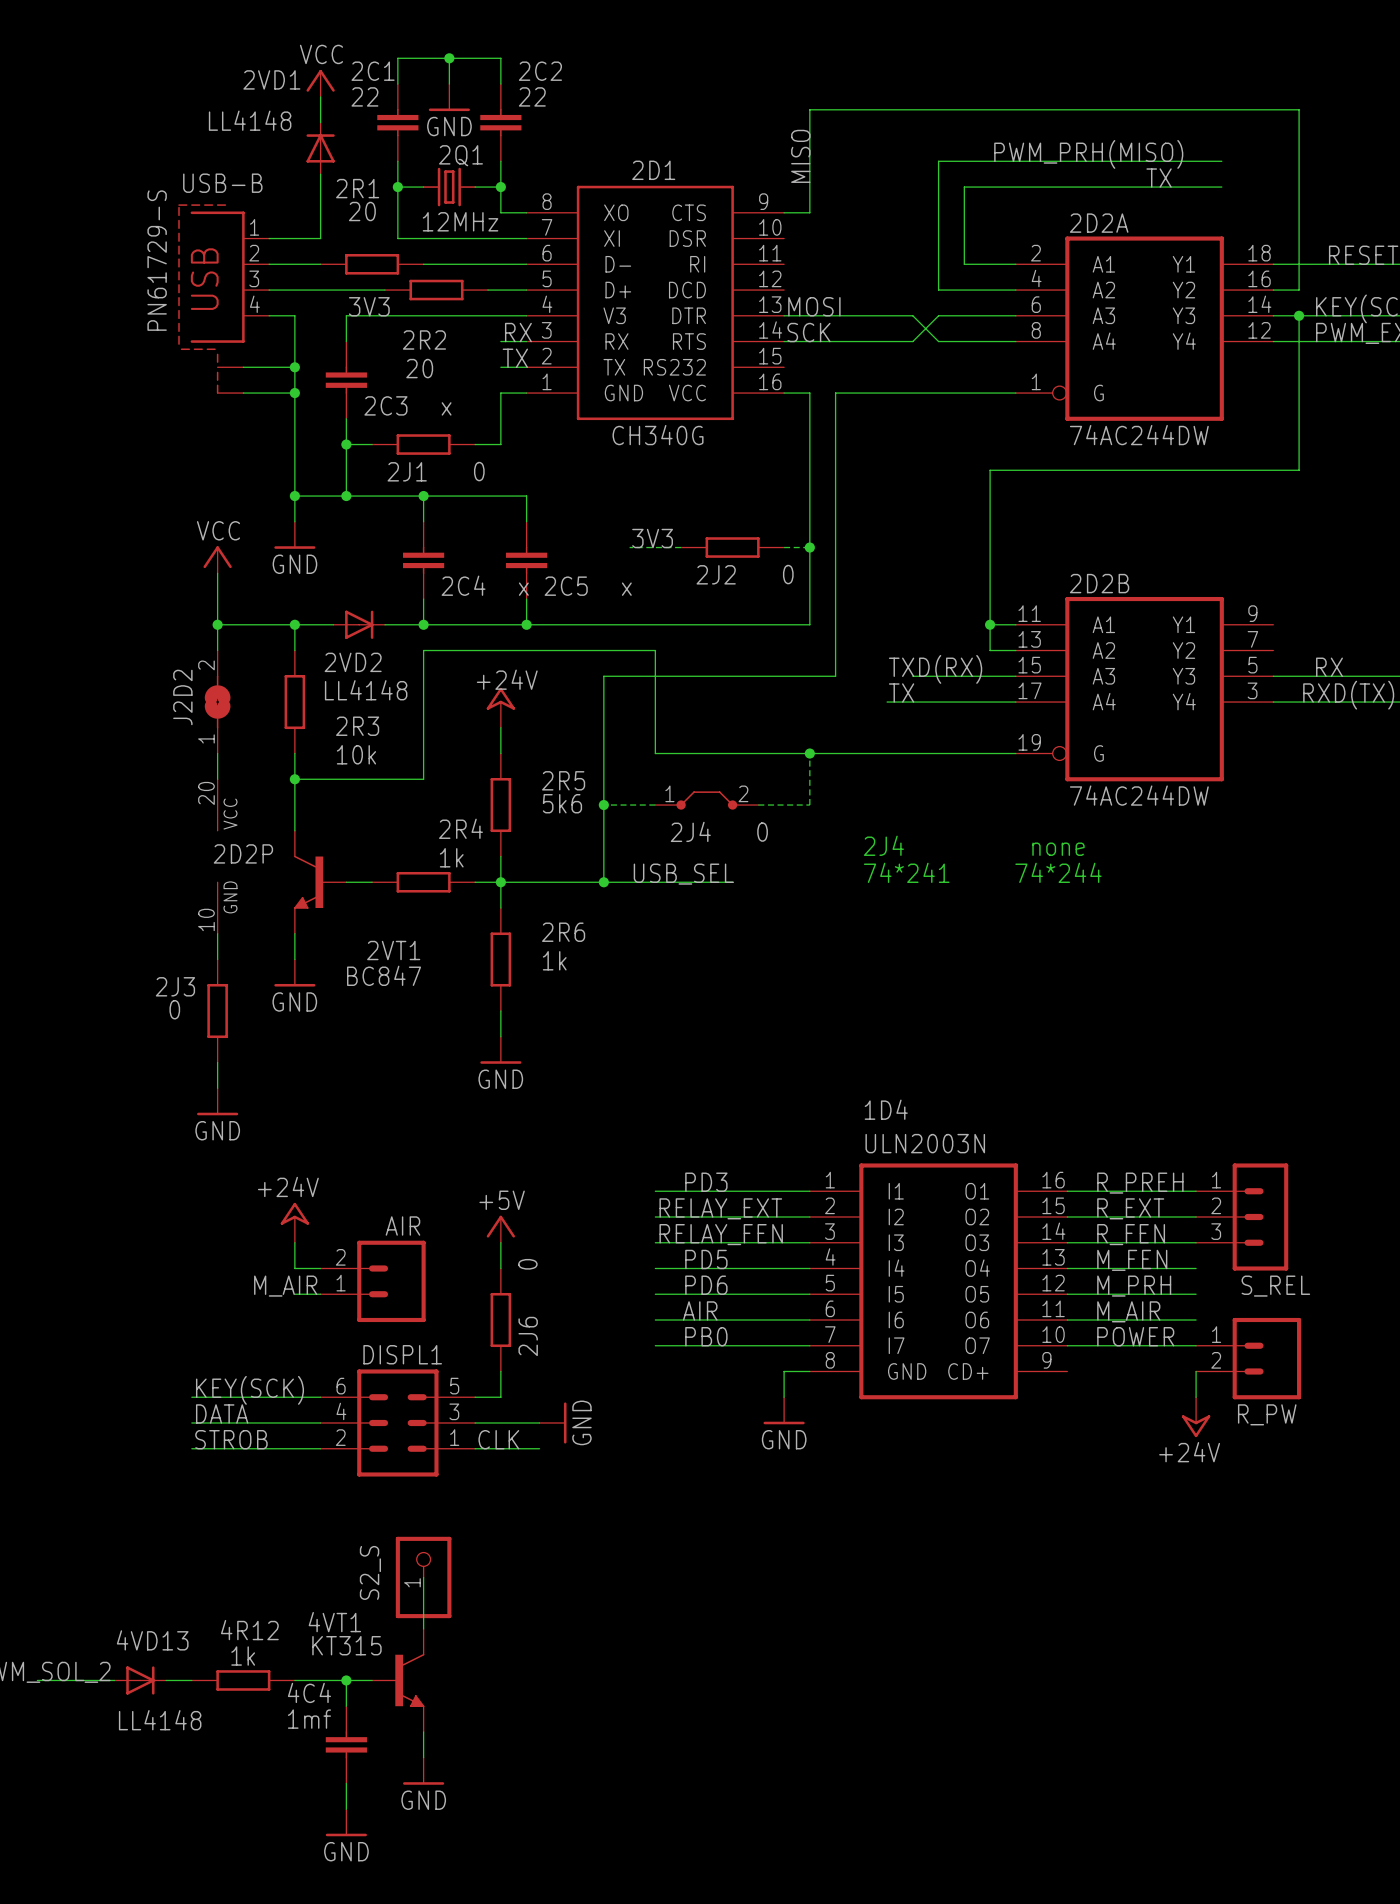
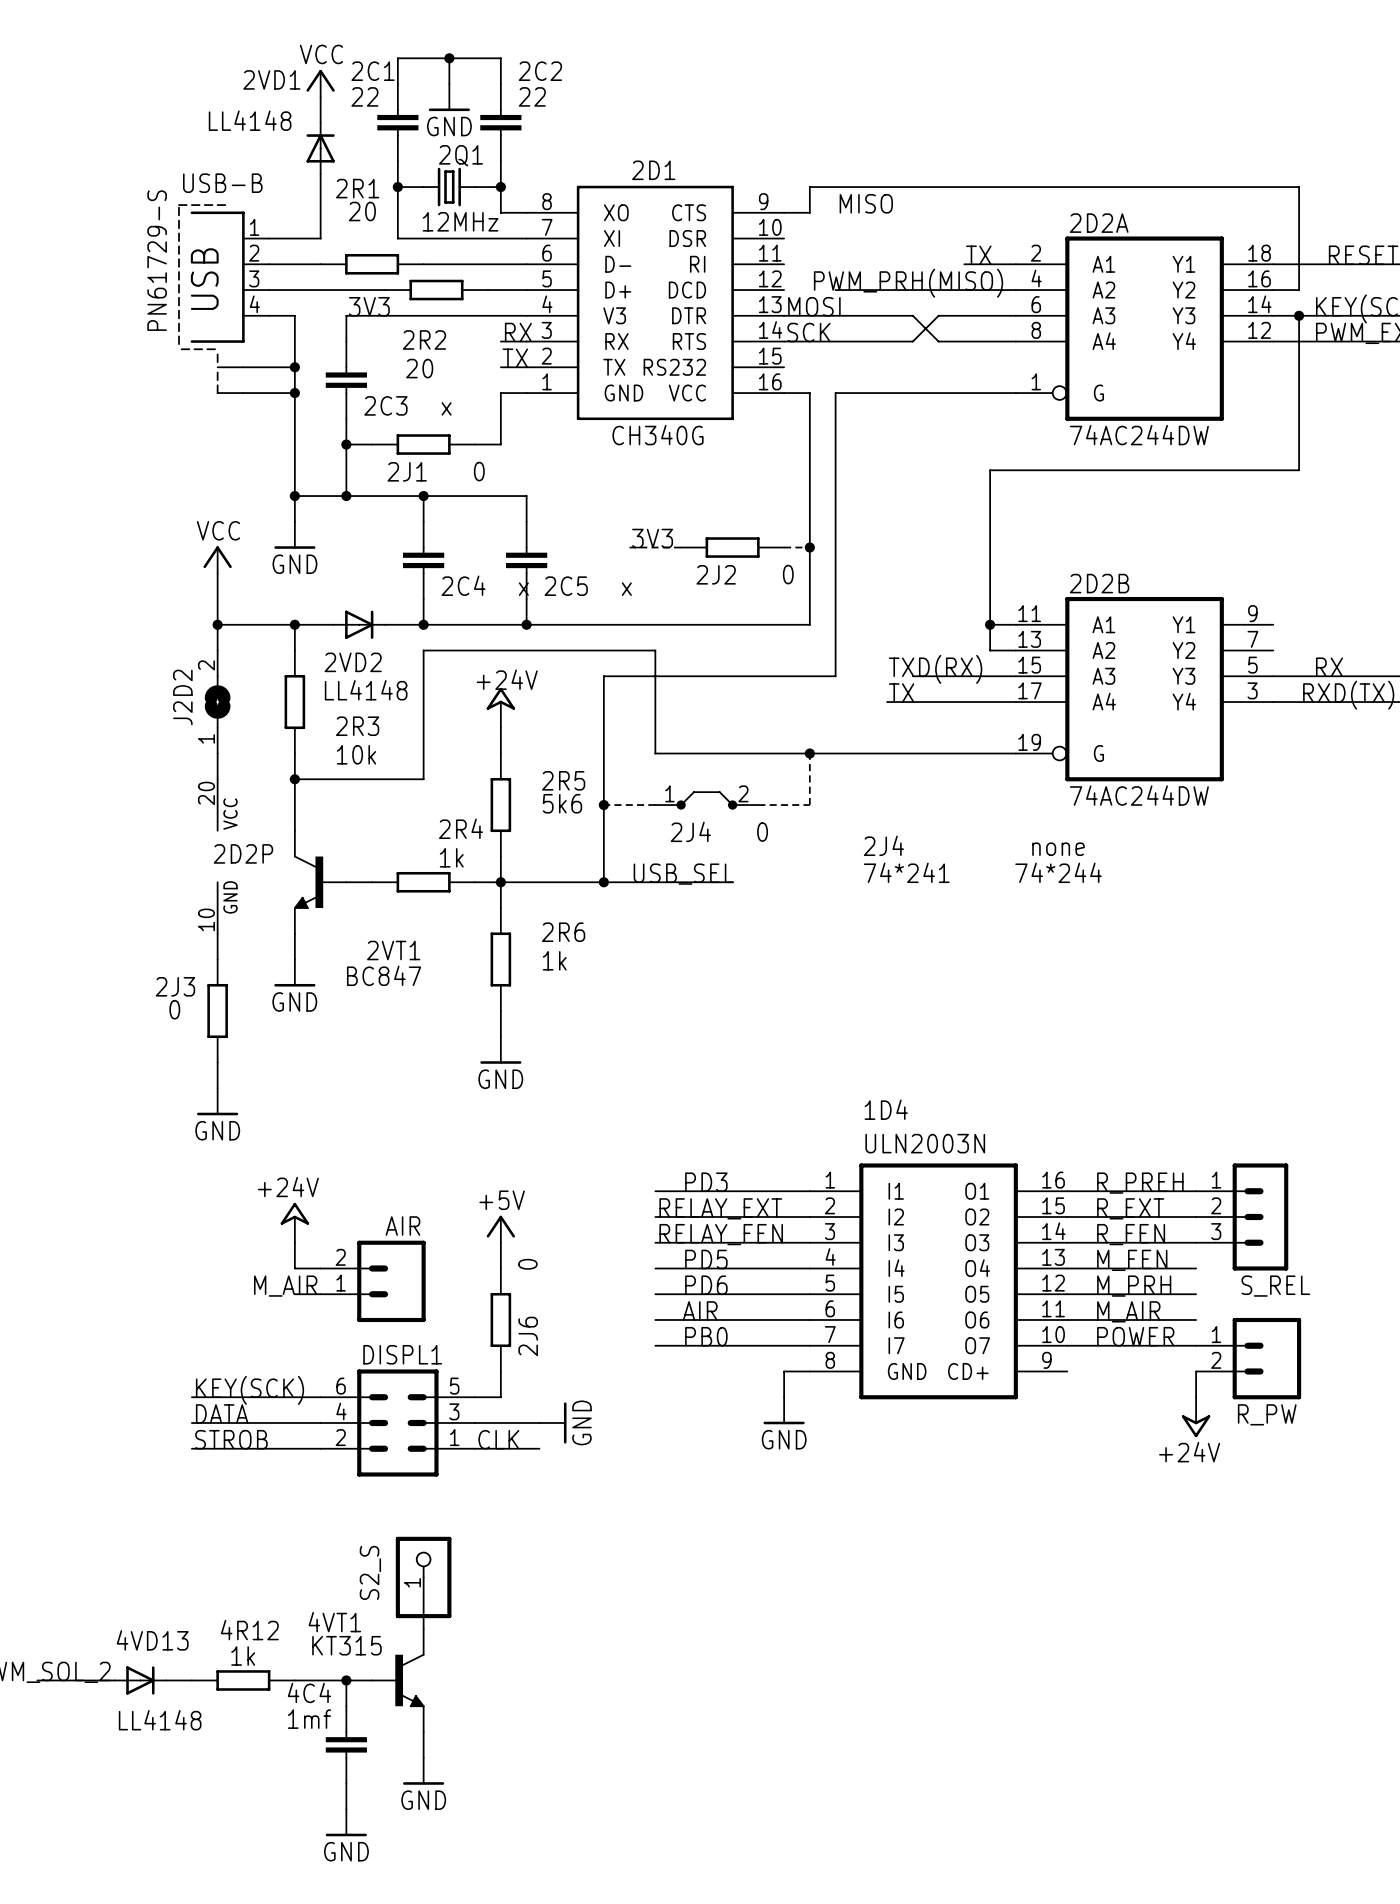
label position: PWM_PRH(MISO) (1088, 154) -> PWM_PRH(MISO) (908, 283)
label rotation: 0° (800, 156) -> 90° clockwise (866, 203)
label position: MISO (800, 156) -> MISO (866, 203)
wire: (1221, 161) (938, 161) (938, 290) -> (835, 290) (938, 290)
label position: TX (1159, 178) -> TX (978, 255)
wire: (809, 187) (809, 109) (1299, 109) (1299, 187) -> (1221, 187) (1299, 187)
wire: (964, 187) (964, 264) -> (964, 187) (809, 187)

